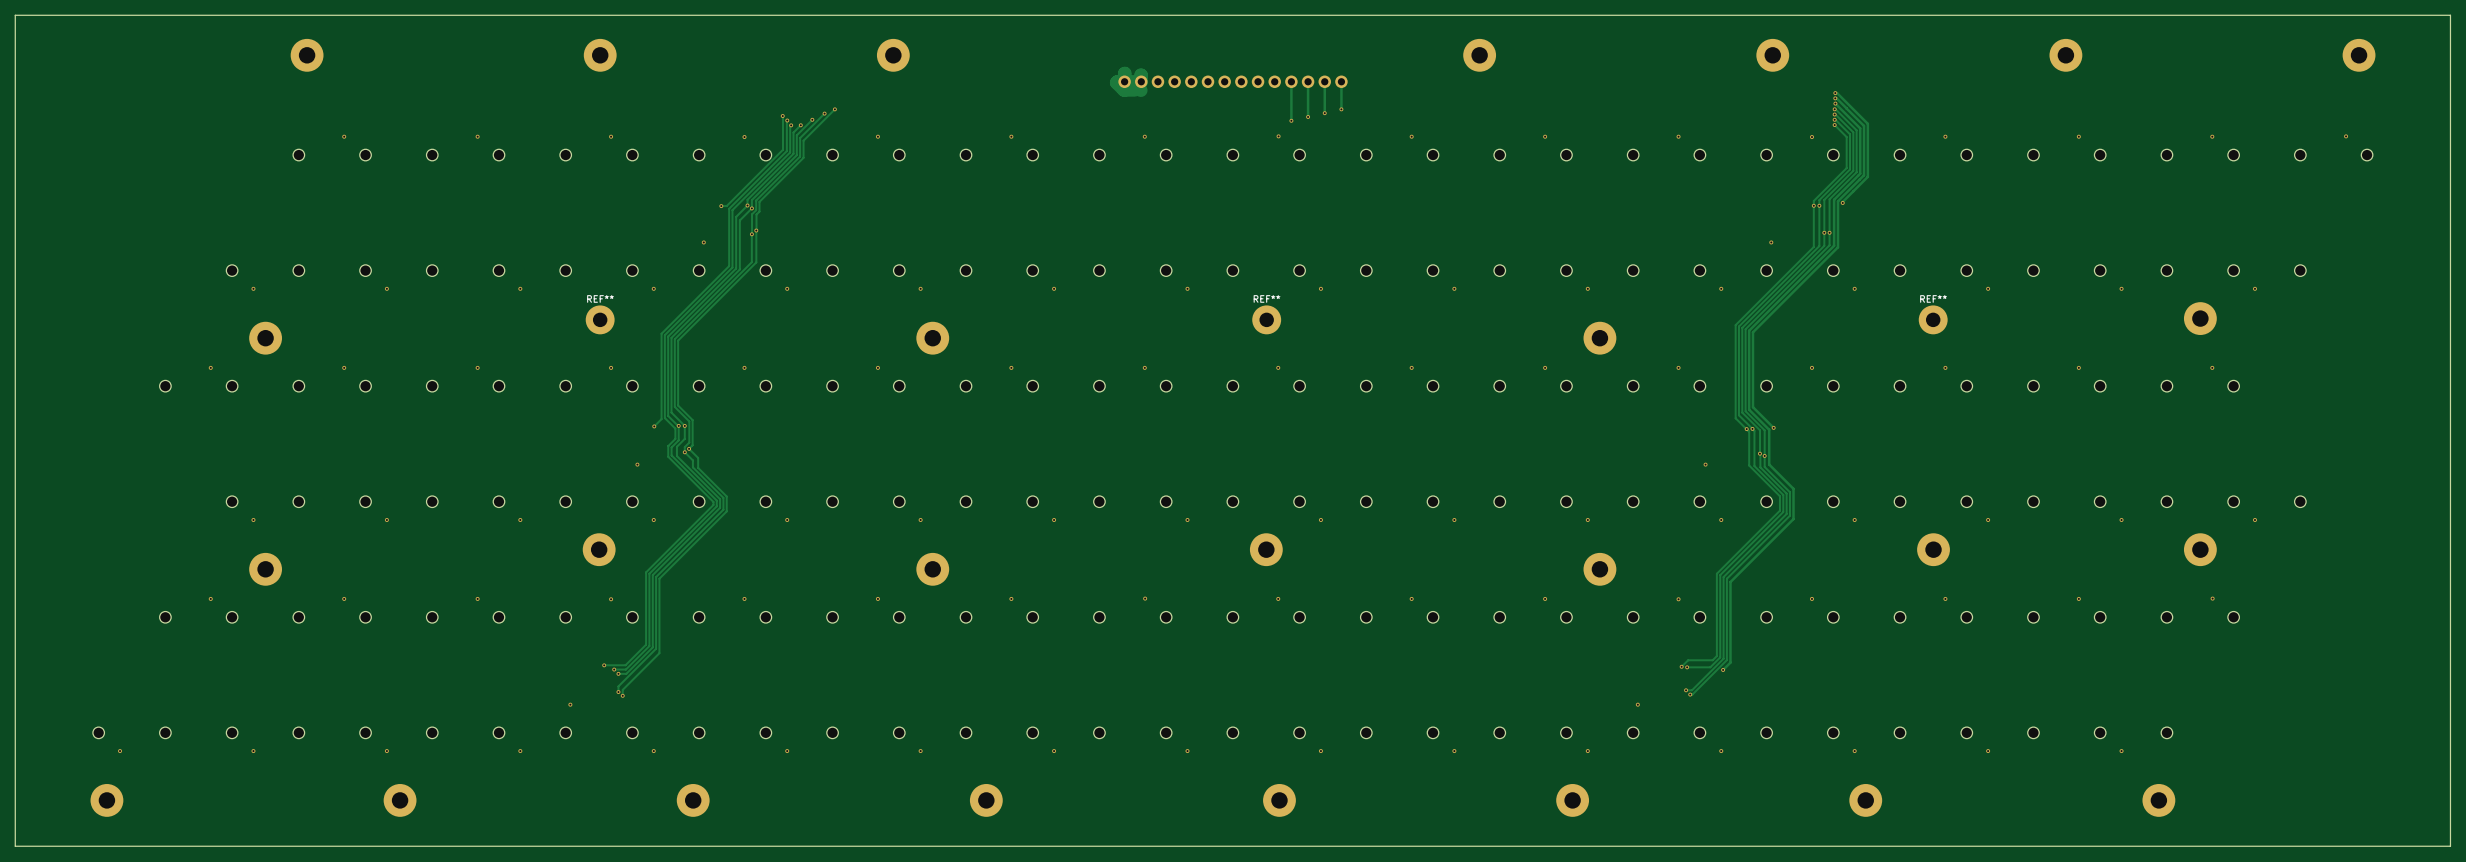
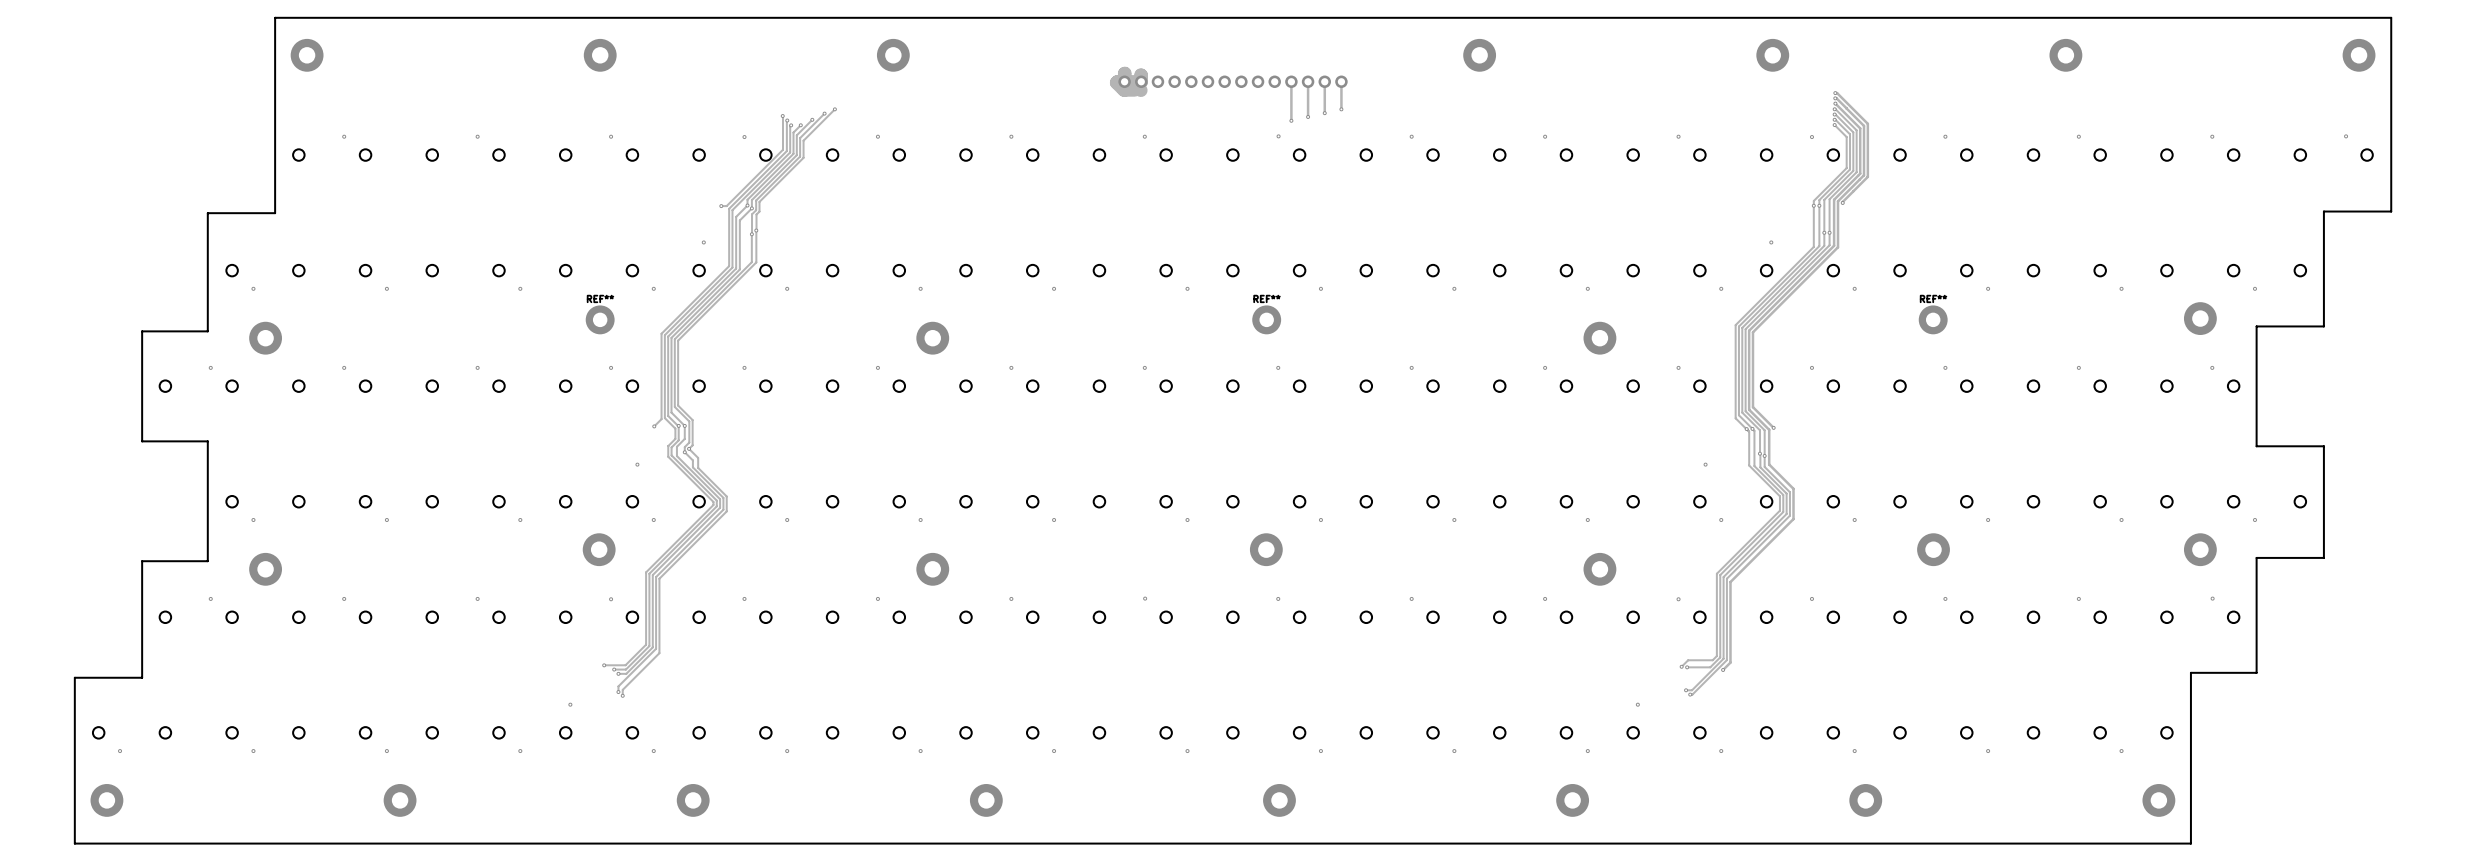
board edge: (15, 15) (2450, 15) (2450, 846) (15, 846) (15, 15) -> (275, 17) (275, 213) (207, 213) (207, 331) (142, 331) (142, 441) (207, 441) (207, 561) (142, 561) (142, 677) (74, 677) (74, 843) (2190, 843) (2190, 672) (2256, 672) (2256, 557) (2323, 557) (2323, 446) (2256, 446) (2256, 326) (2323, 326) (2323, 211) (2391, 211) (2391, 17) (275, 17)

